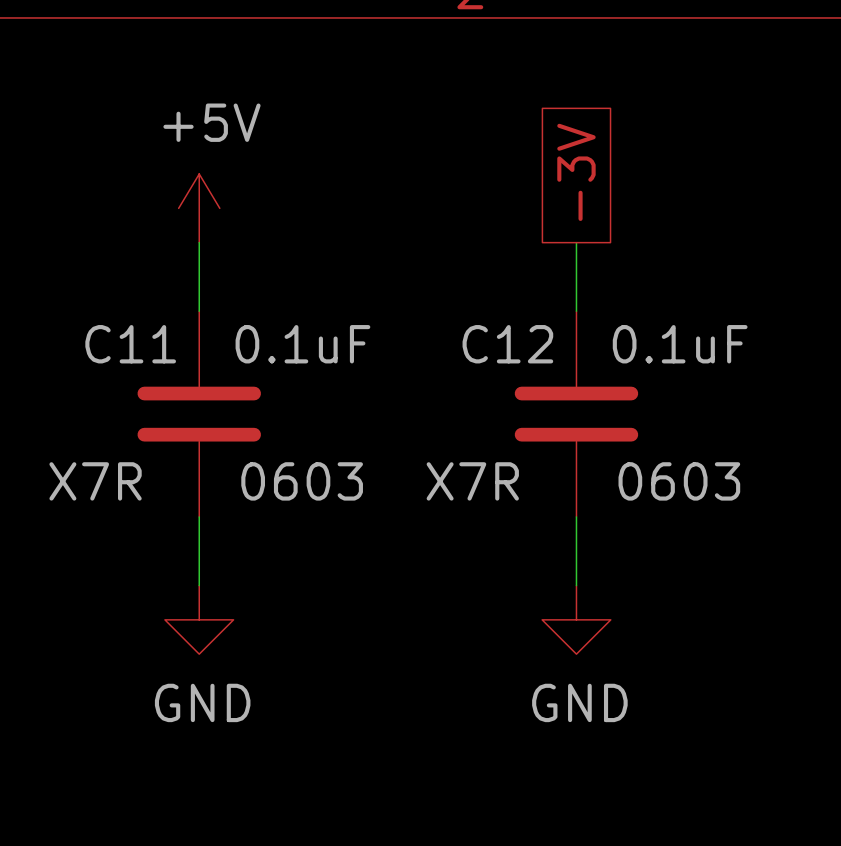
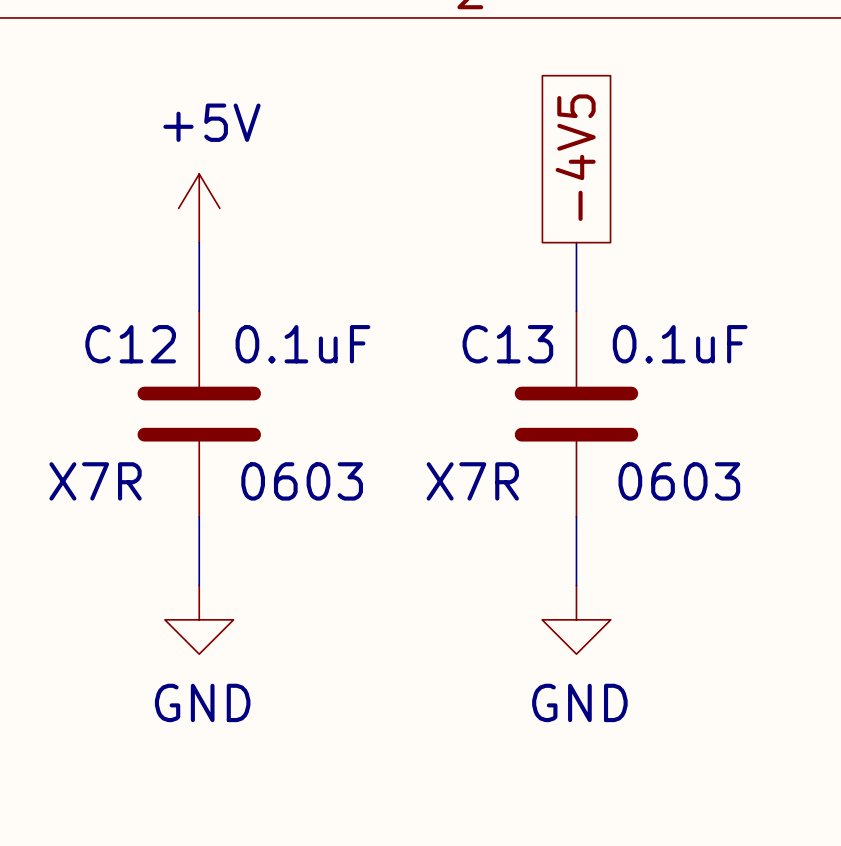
global label: -3V (576, 172) -> -4V5 (575, 157)
C11 name: C11 (130, 344) -> C12 (130, 344)
C12 name: C12 (507, 344) -> C13 (507, 344)

